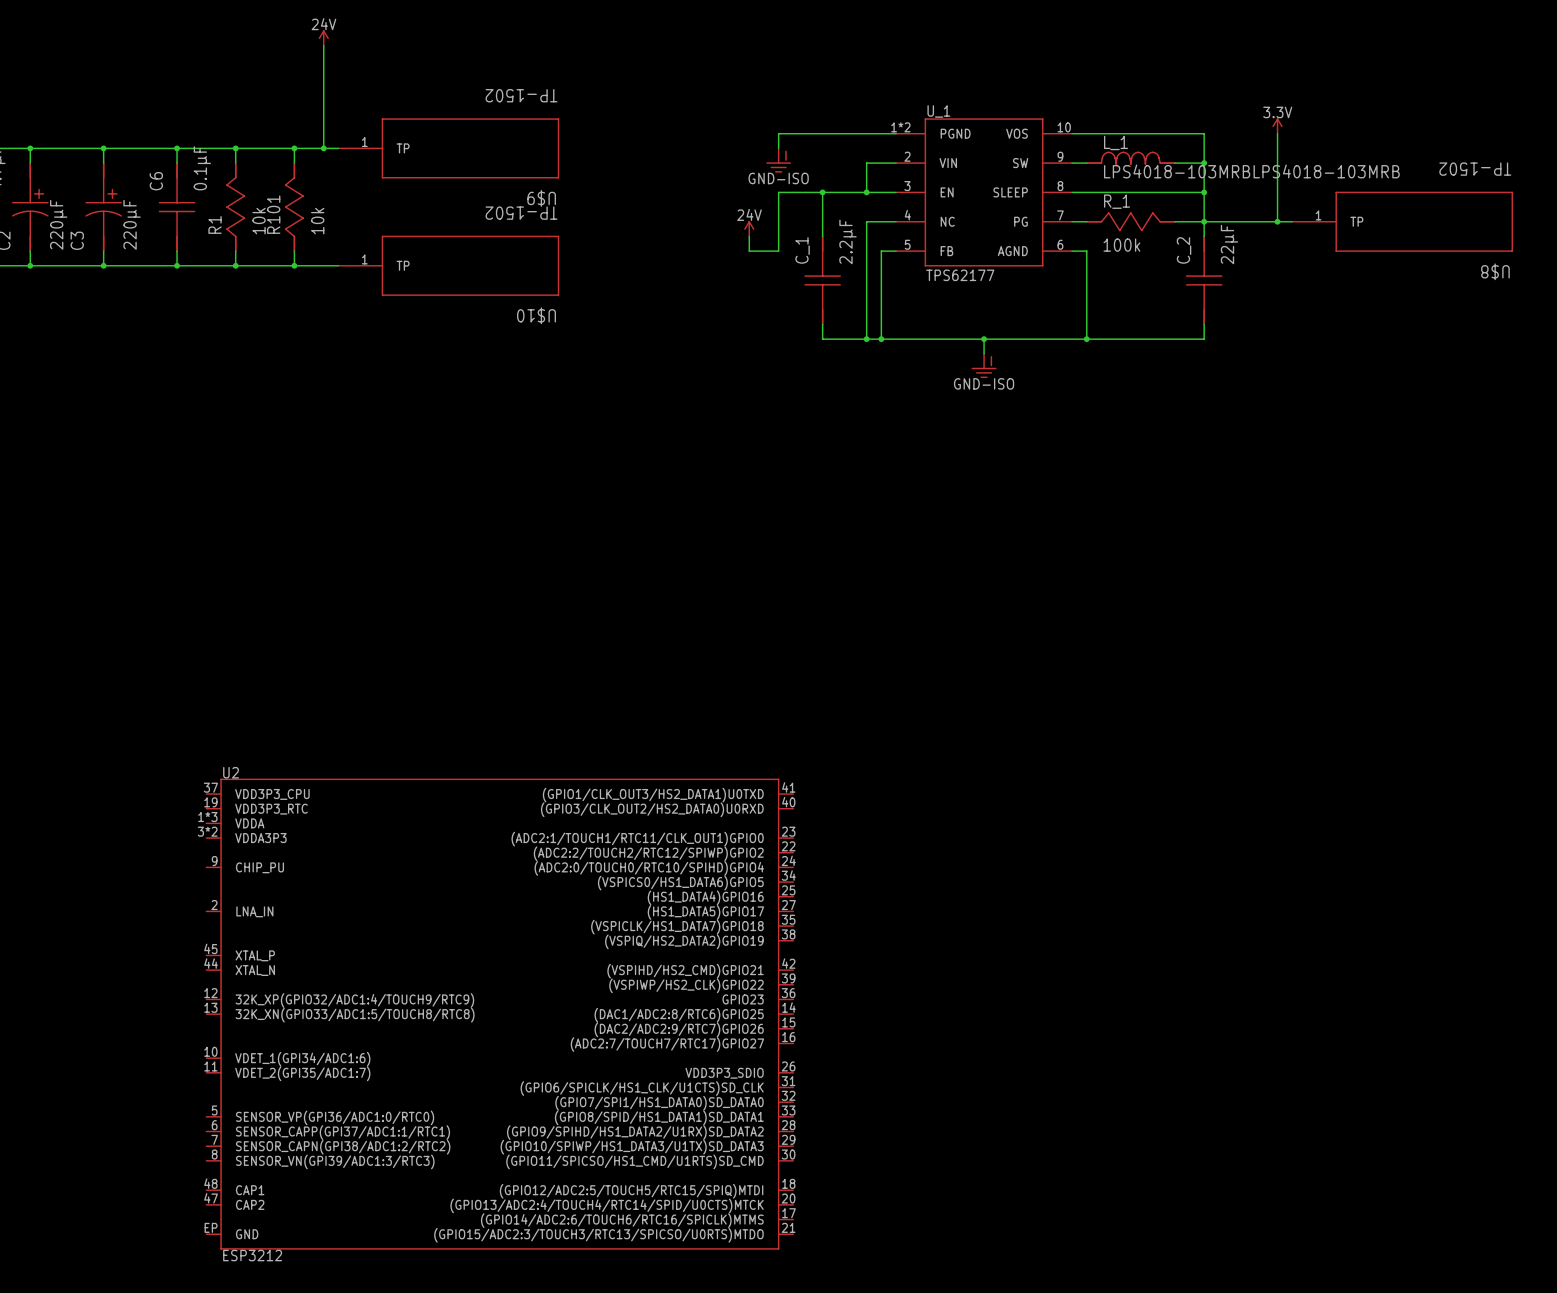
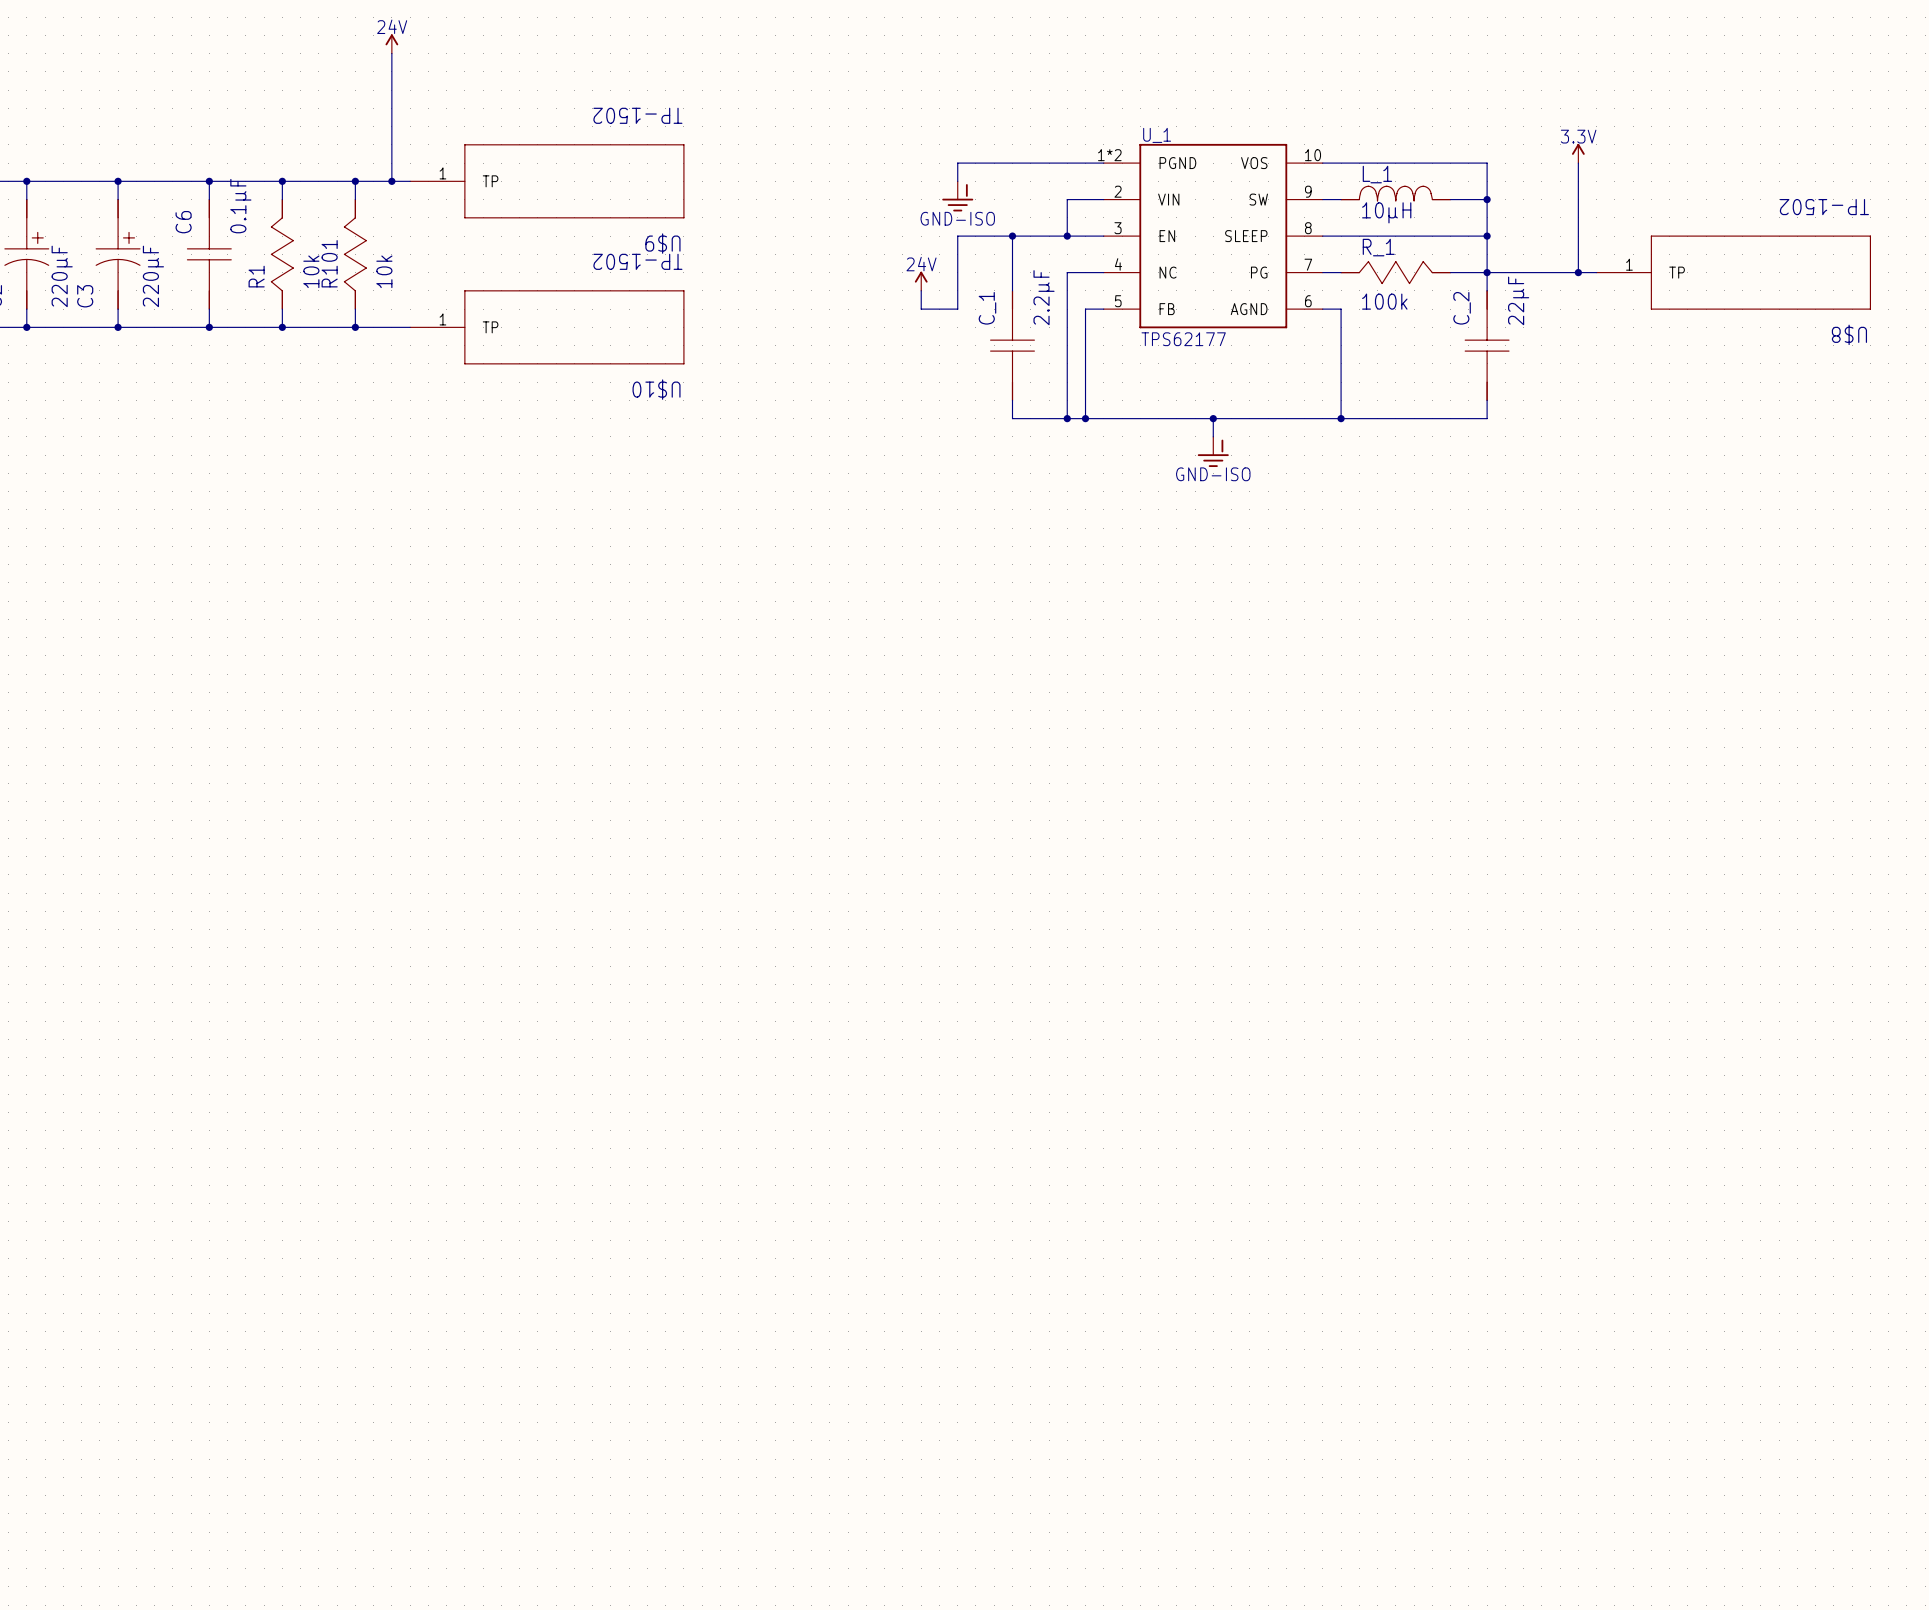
L_1 value: LPS4018-103MRBLPS4018-103MRB (1251, 171) -> 10µH (1386, 212)
U2: ESP3212 (499, 1014) -> none

